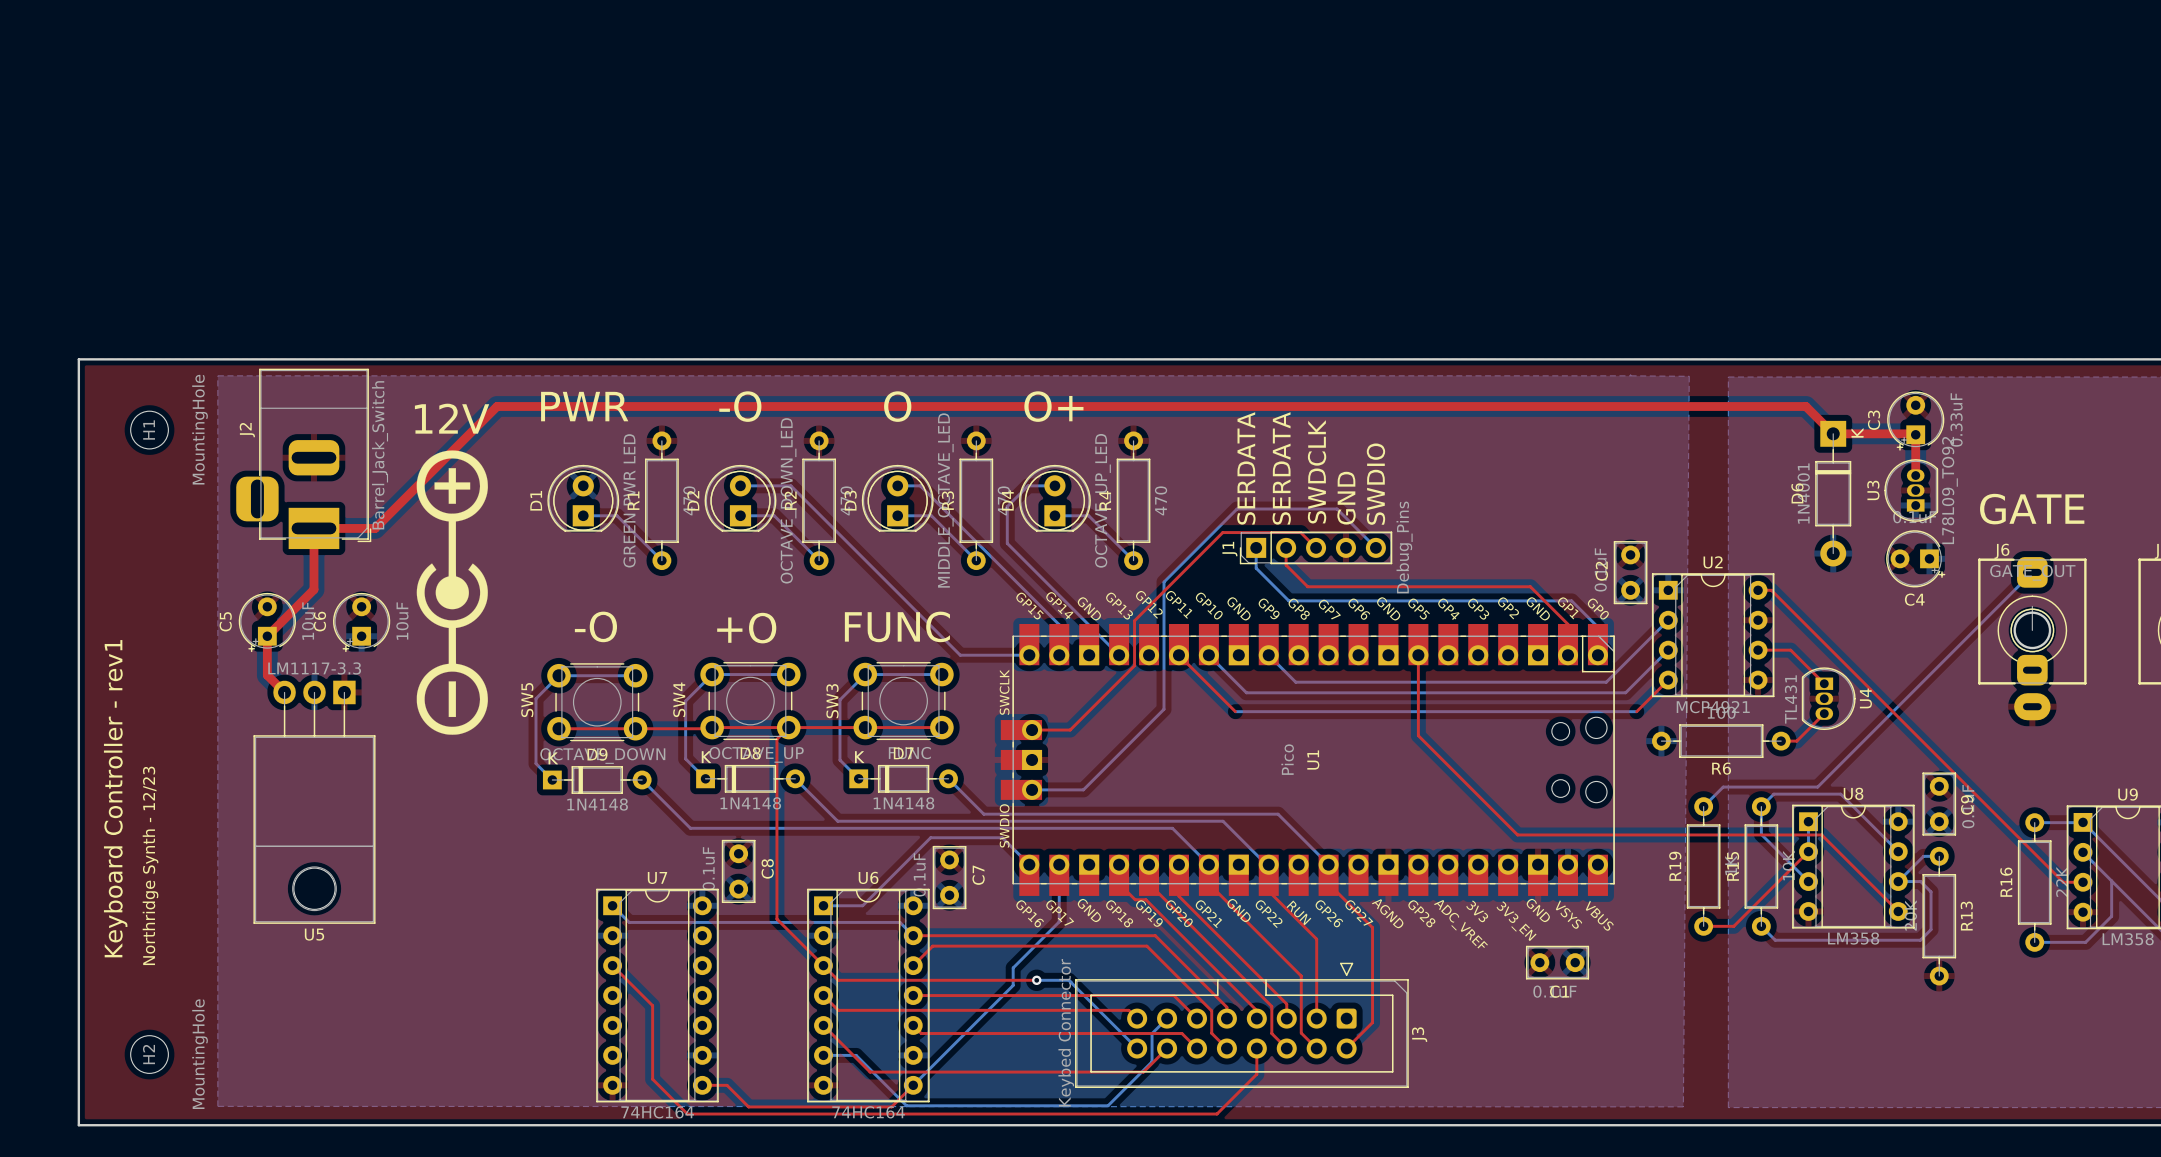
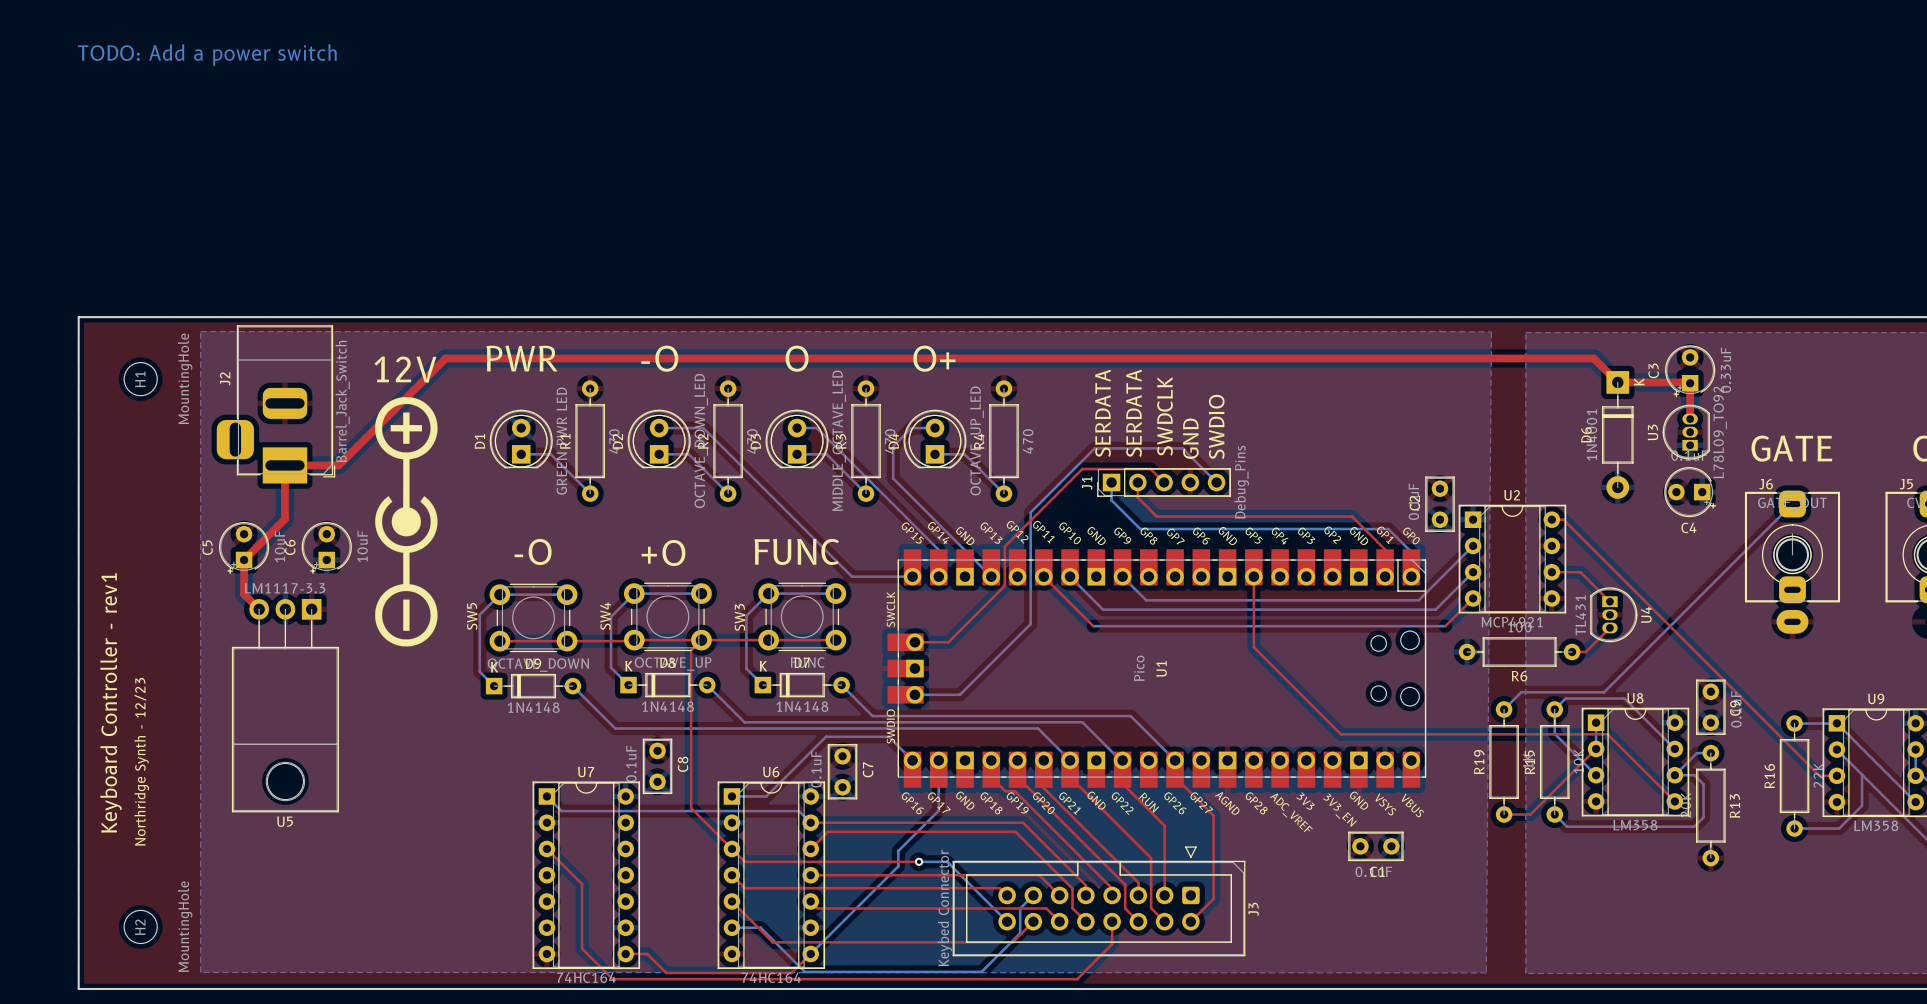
text: none -> TODO: Add a power switch (207, 54)

